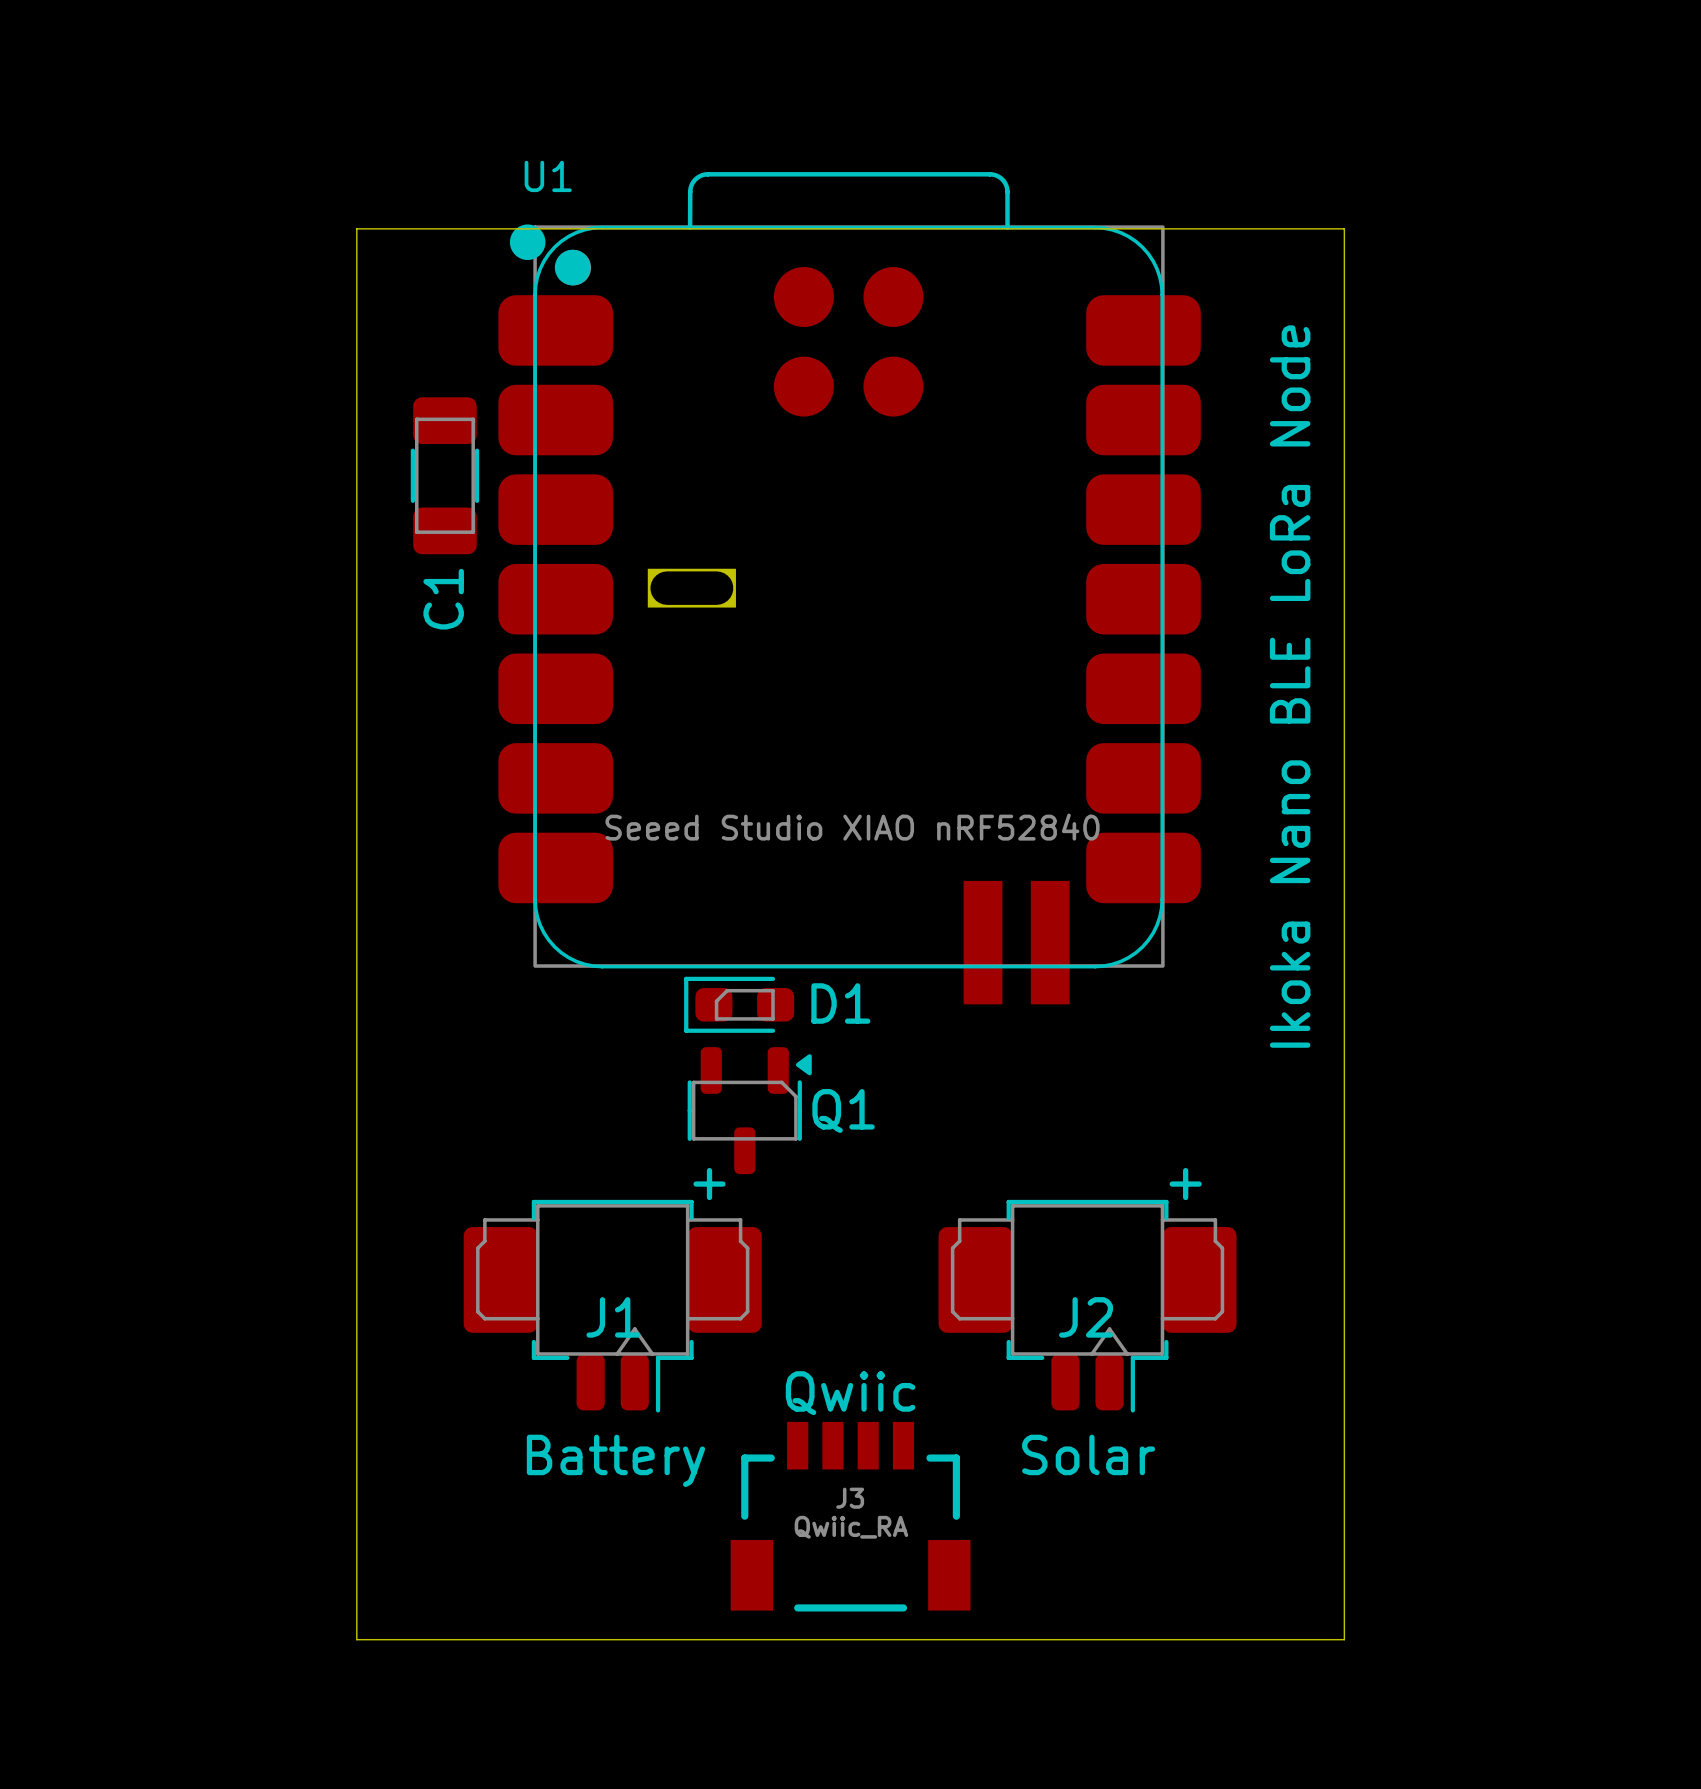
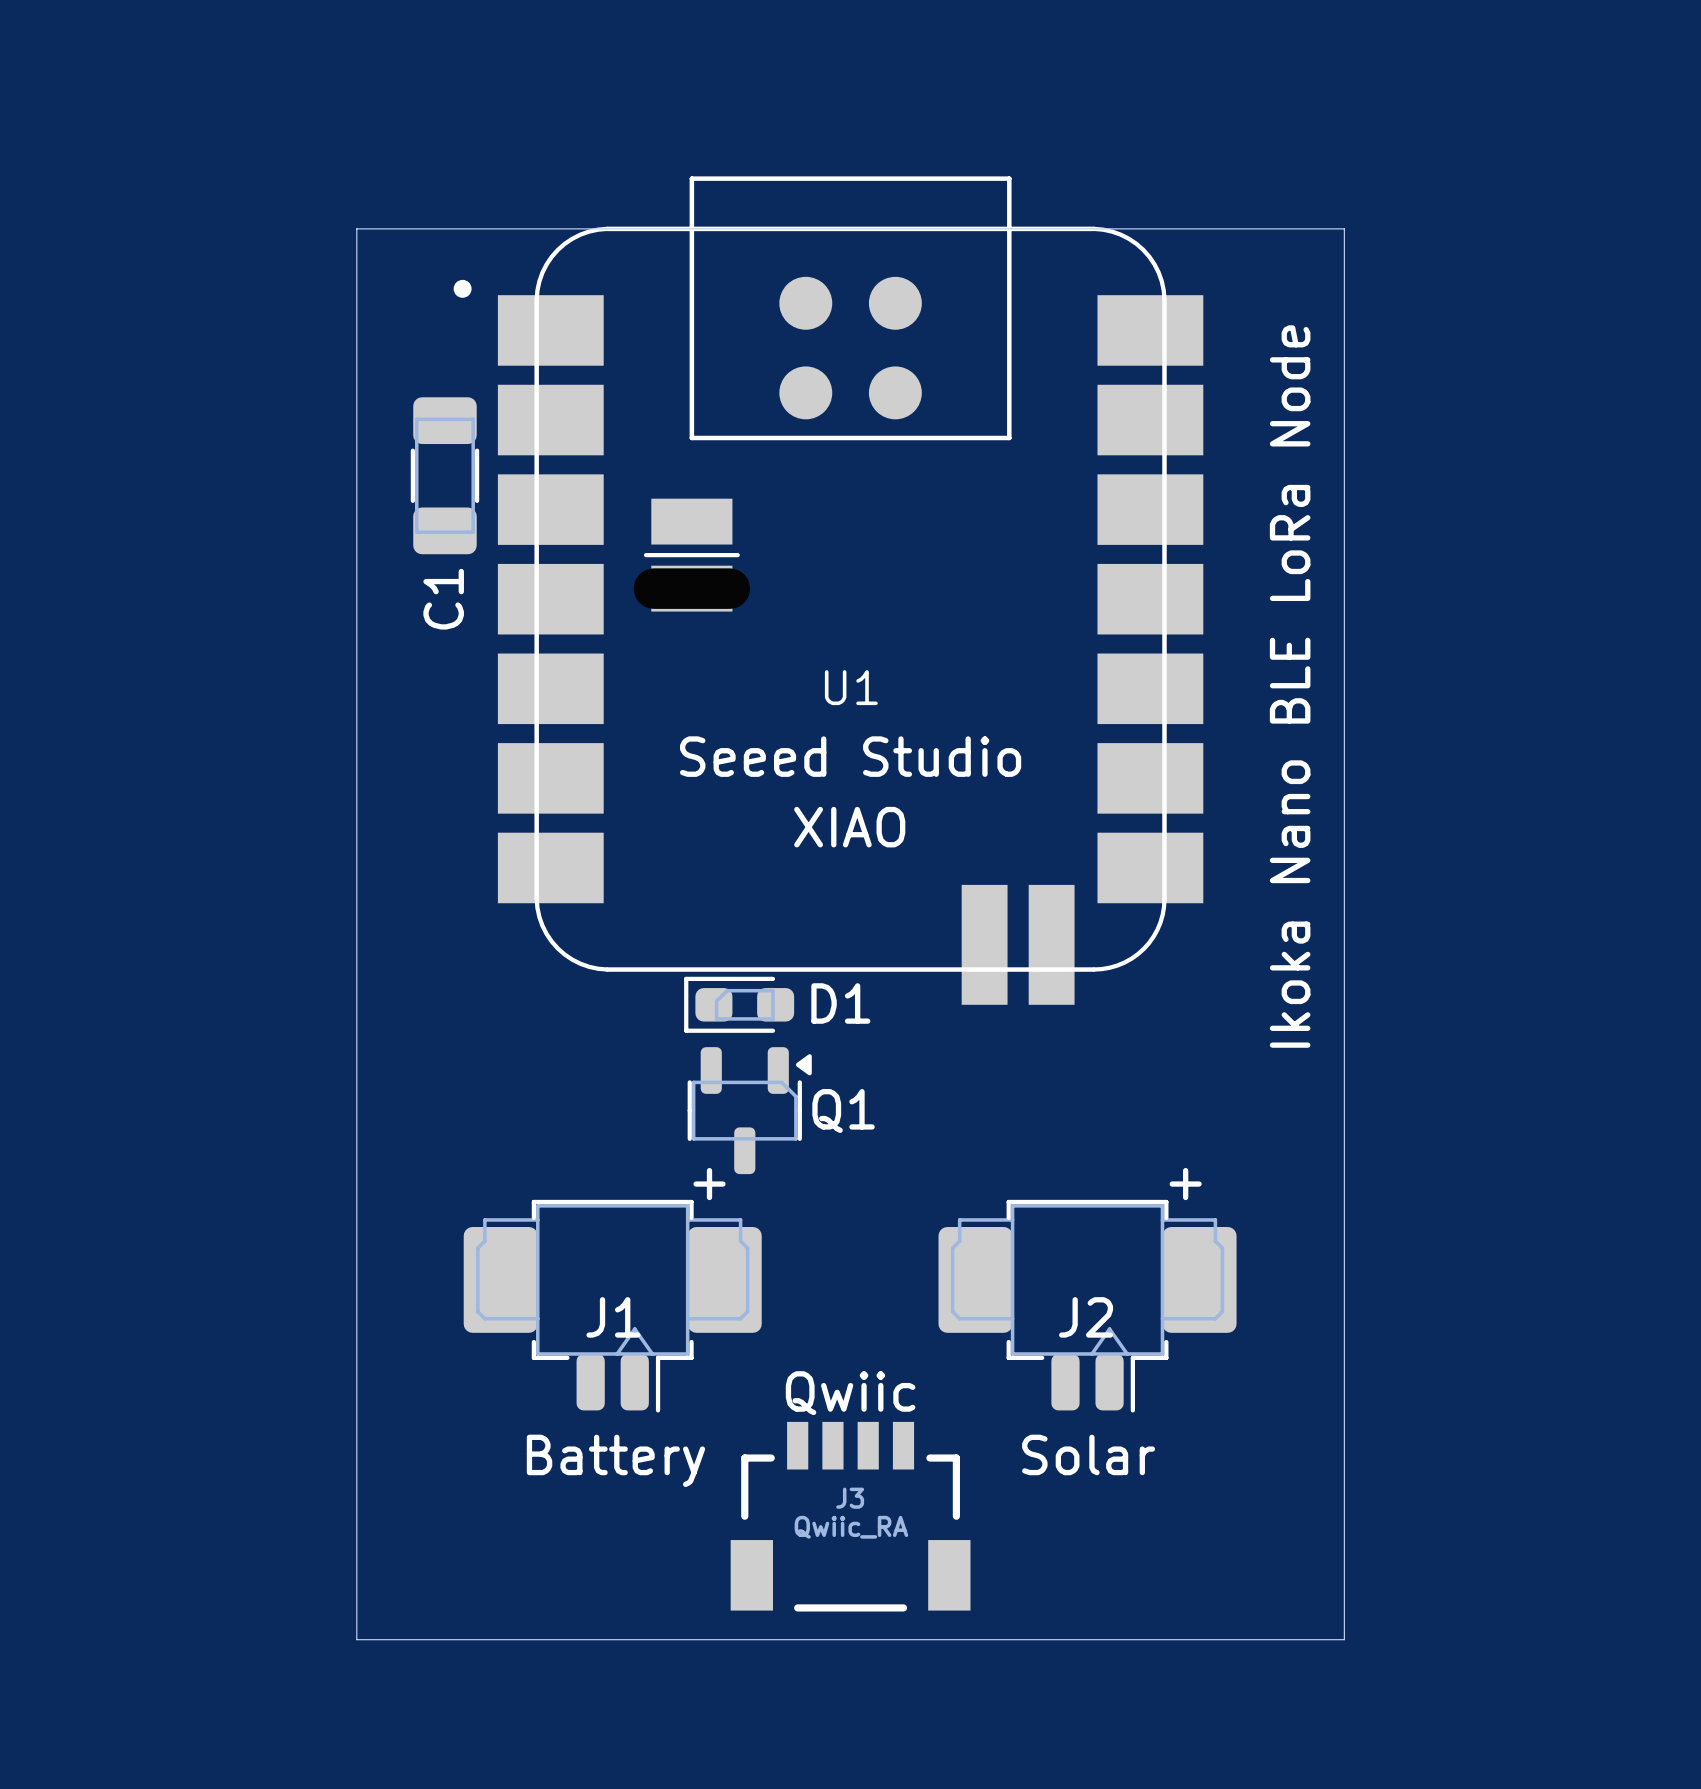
U1 footprint: [498, 172, 1201, 1005] -> [453, 176, 1204, 1005]
U1 name position: U1 (548, 176) -> U1 (851, 687)
U1 value: Seeed Studio XIAO nRF52840 (852, 827) -> none

